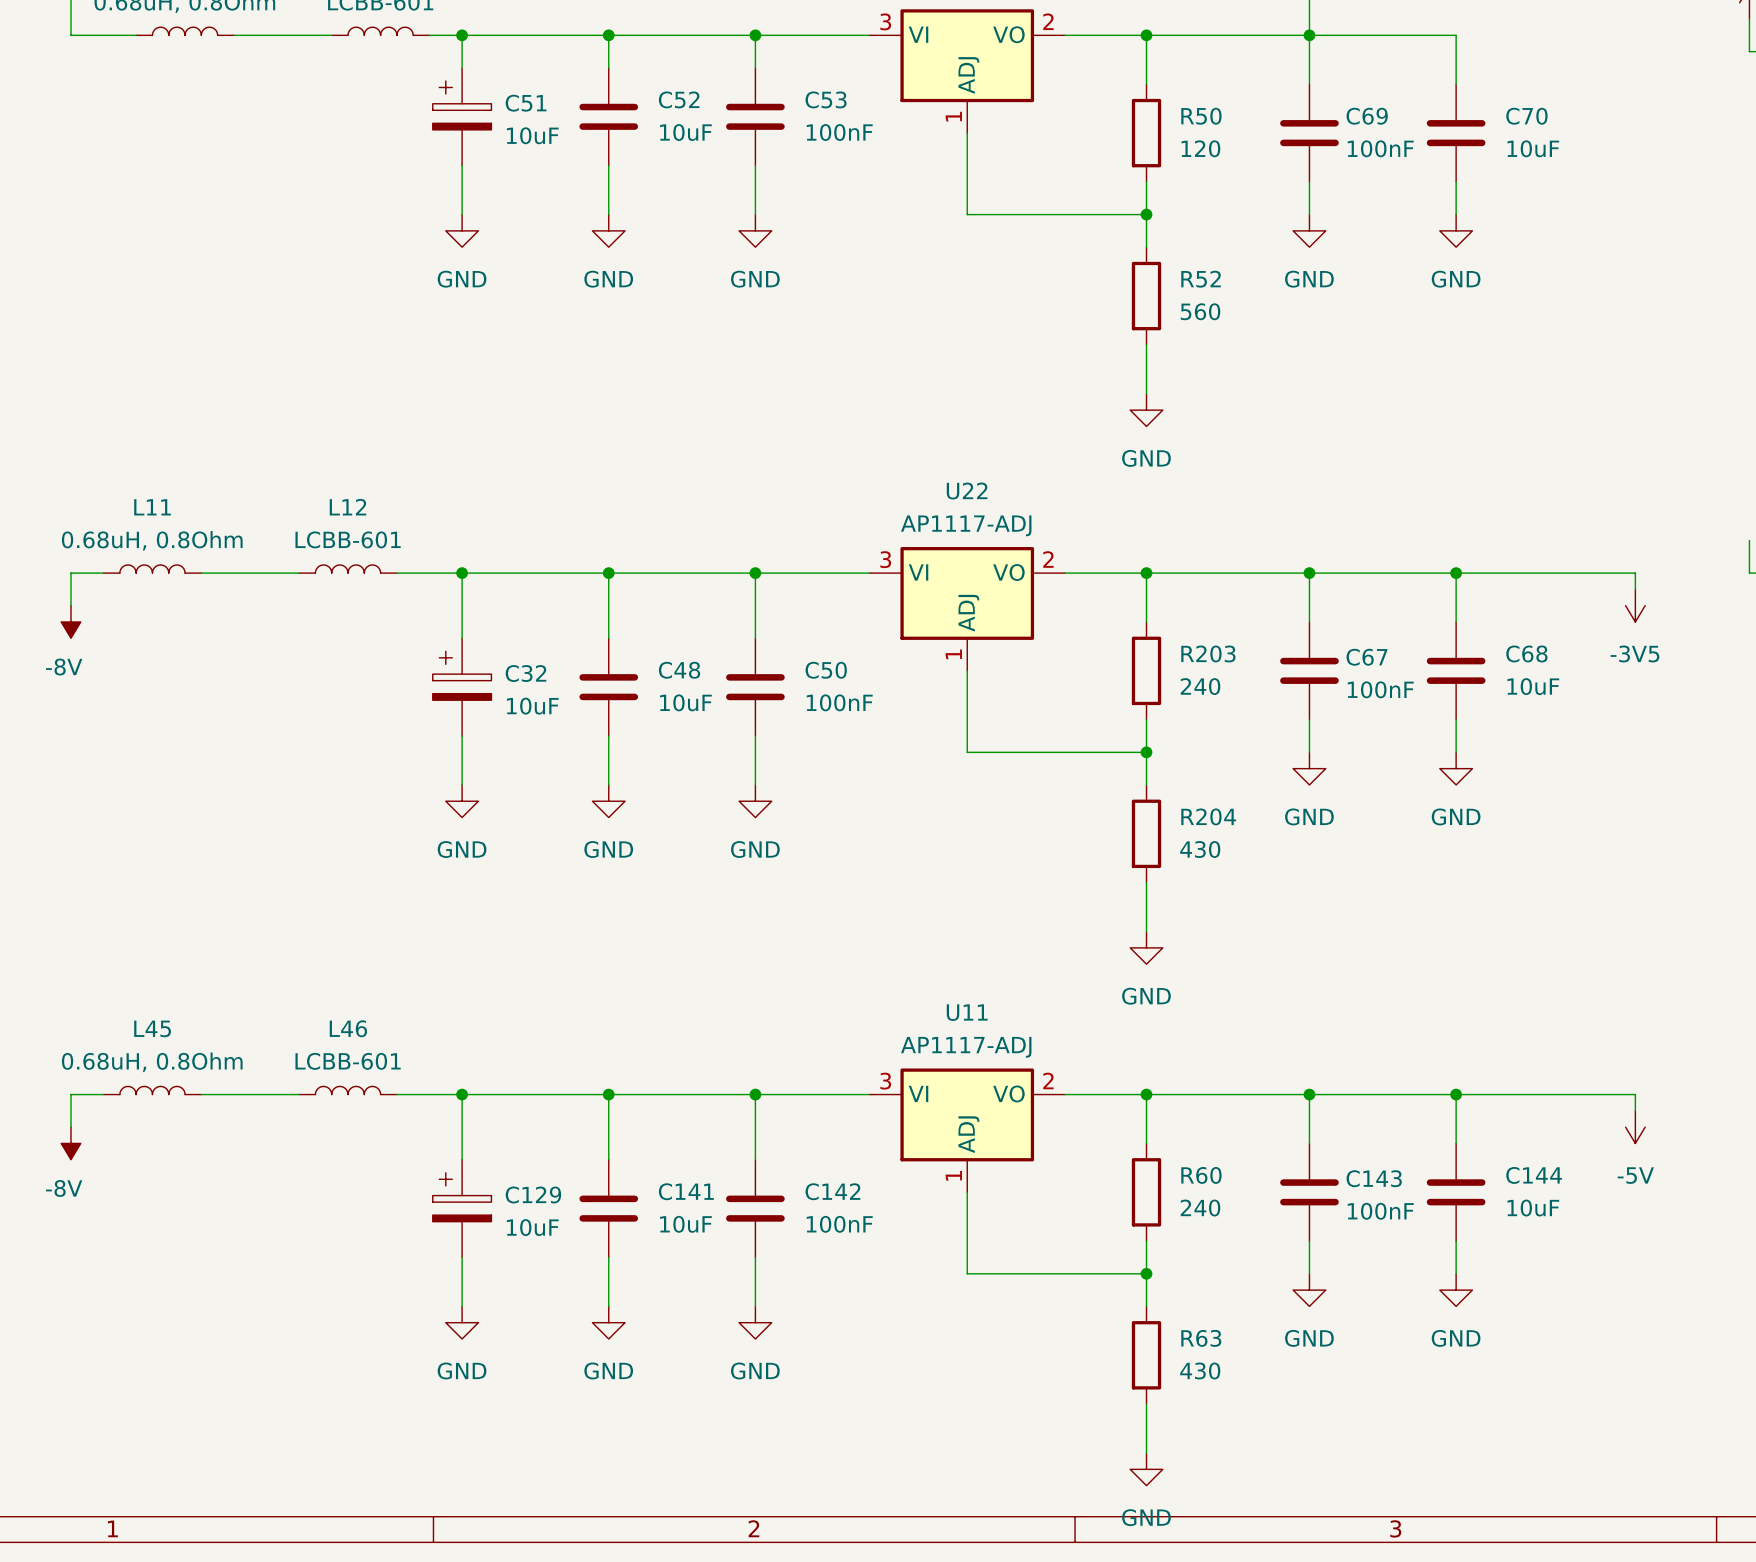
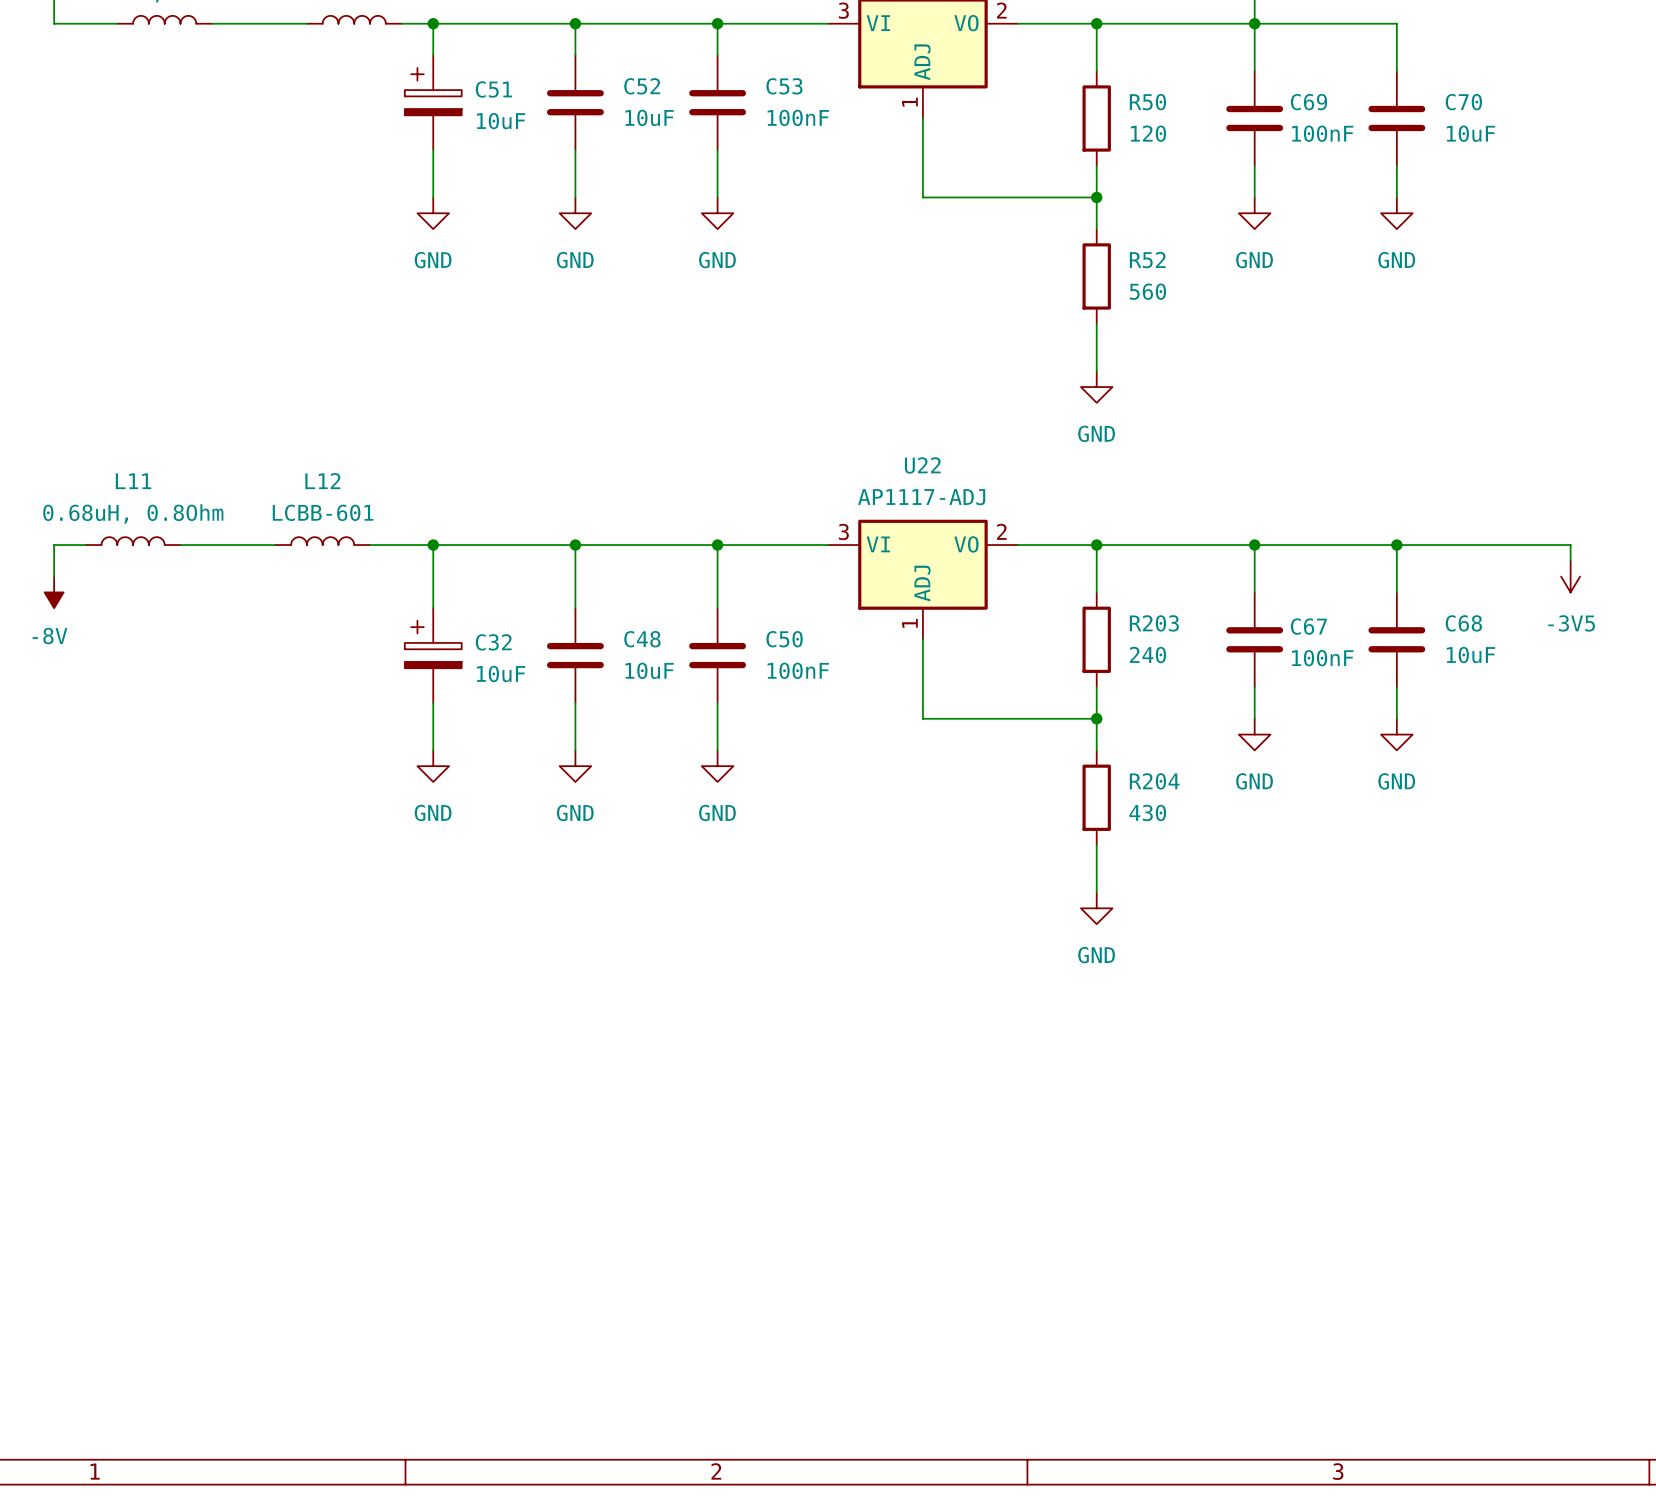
L45: 0.68uH, 0.8Ohm (152, 1090) -> none
L46: LCBB-601 (348, 1090) -> none
wire: (103, 1094) (70, 1094) (70, 1127) -> none
wire: (201, 1094) (299, 1094) -> none
wire: (396, 1094) (869, 1094) -> none
wire: (462, 1094) (462, 1159) -> none
junction: (462, 1094) -> none
wire: (608, 1094) (608, 1159) -> none
junction: (608, 1094) -> none
wire: (755, 1094) (755, 1159) -> none
junction: (755, 1094) -> none
wire: (1065, 1094) (1635, 1094) (1635, 1110) -> none
wire: (1146, 1094) (1146, 1143) -> none
junction: (1146, 1094) -> none
wire: (1309, 1094) (1309, 1143) -> none
junction: (1309, 1094) -> none
wire: (1456, 1094) (1456, 1143) -> none
junction: (1456, 1094) -> none
power symbol: -5V (1635, 1127) -> none
U11: AP1117-ADJ (967, 1130) -> none
power symbol: -8V (70, 1143) -> none
wire: (967, 1192) (967, 1273) (1146, 1273) -> none
R60: 240 (1146, 1192) -> none
C143: 100nF (1309, 1192) -> none
C144: 10uF (1456, 1192) -> none
C129: 10uF (462, 1208) -> none
C141: 10uF (608, 1208) -> none
C142: 100nF (755, 1208) -> none
wire: (1146, 1241) (1146, 1306) -> none
wire: (1309, 1241) (1309, 1273) -> none
wire: (1456, 1241) (1456, 1273) -> none
wire: (462, 1257) (462, 1306) -> none
wire: (608, 1257) (608, 1306) -> none
wire: (755, 1257) (755, 1306) -> none
junction: (1146, 1273) -> none
power symbol: GND (1309, 1290) -> none
power symbol: GND (1456, 1290) -> none
power symbol: GND (462, 1322) -> none
power symbol: GND (608, 1322) -> none
power symbol: GND (755, 1322) -> none
R63: 430 (1146, 1355) -> none
wire: (1146, 1404) (1146, 1453) -> none
power symbol: GND (1146, 1469) -> none

